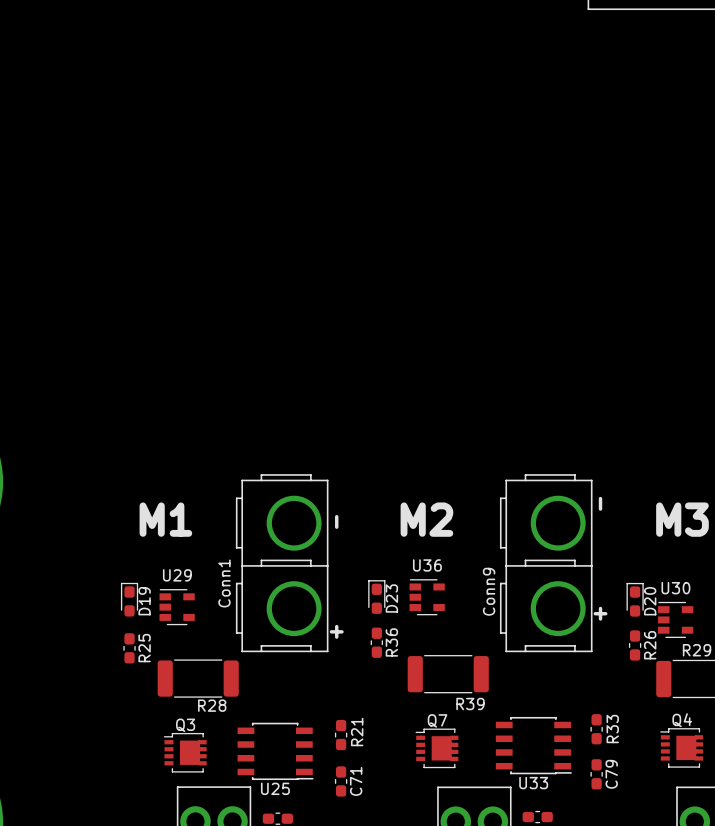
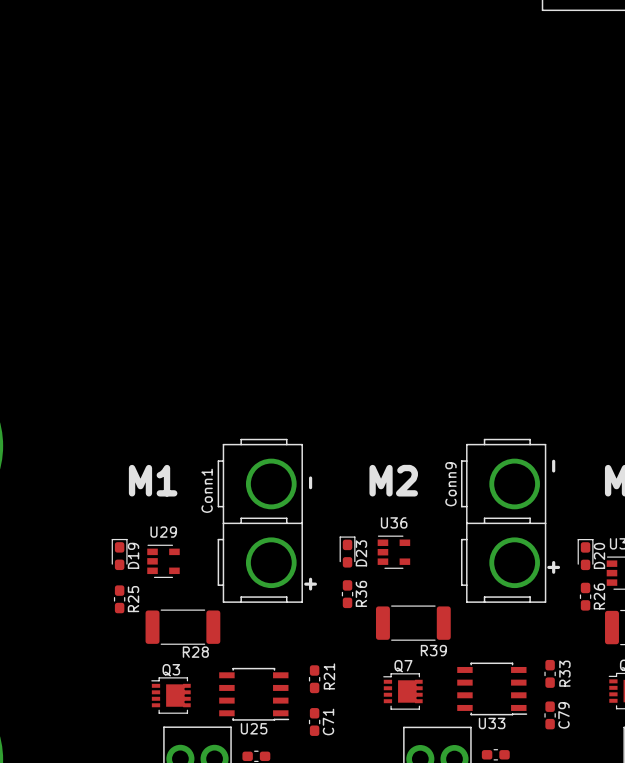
Conn1 name position: Conn1 (224, 583) -> Conn1 (207, 490)
Conn9 name position: Conn9 (489, 591) -> Conn9 (450, 484)

